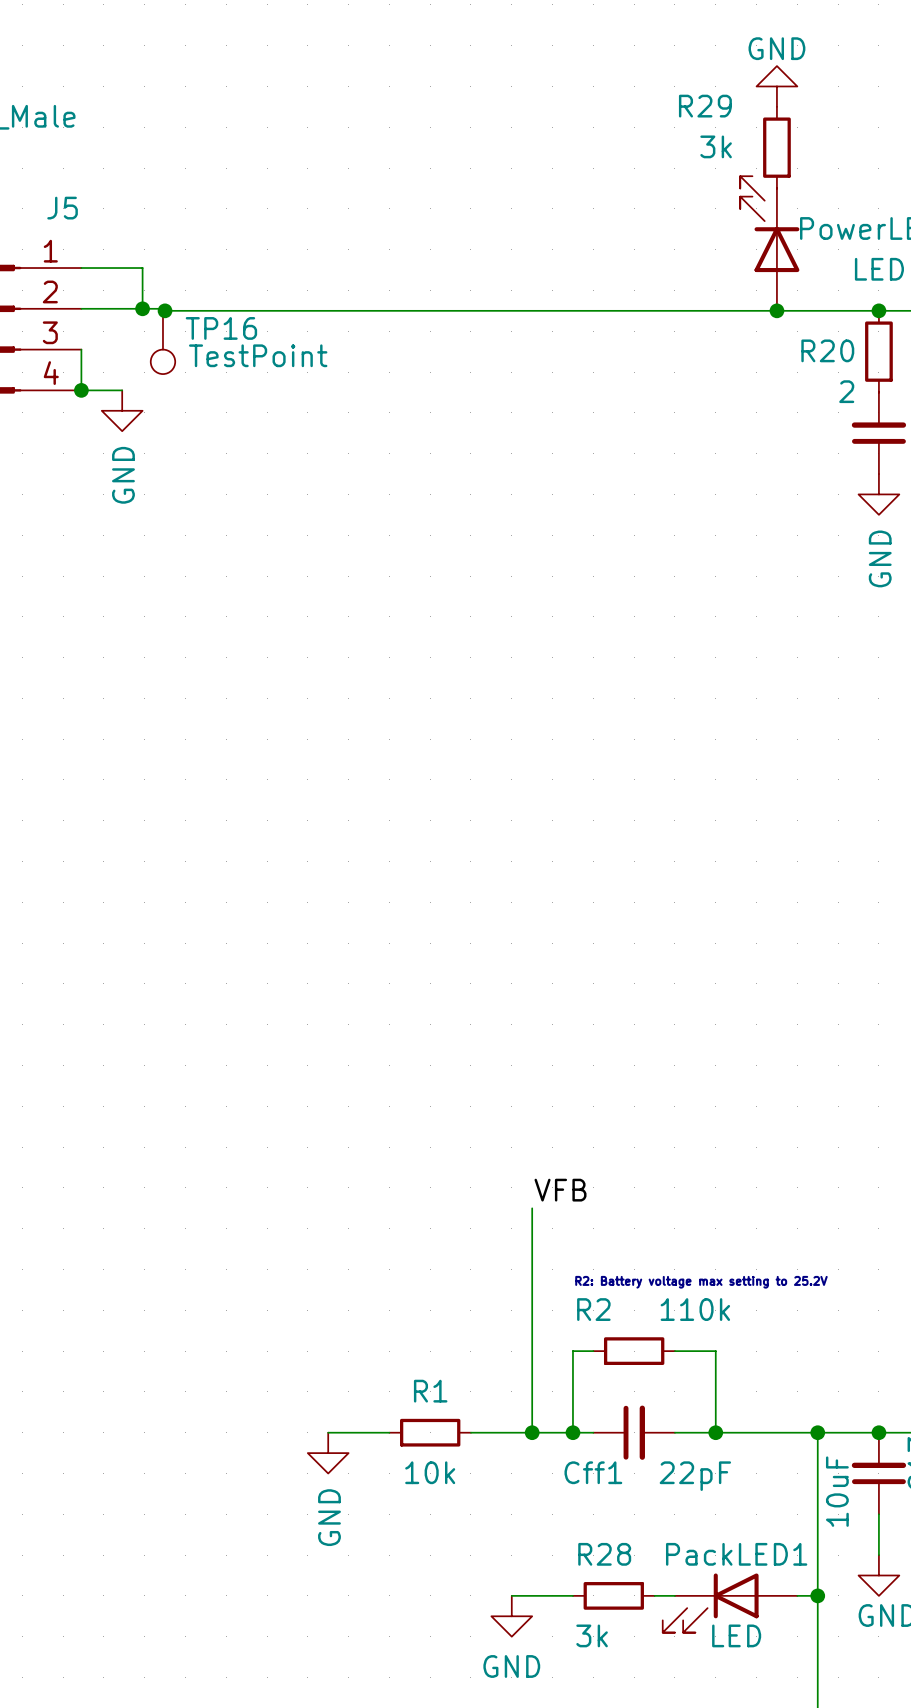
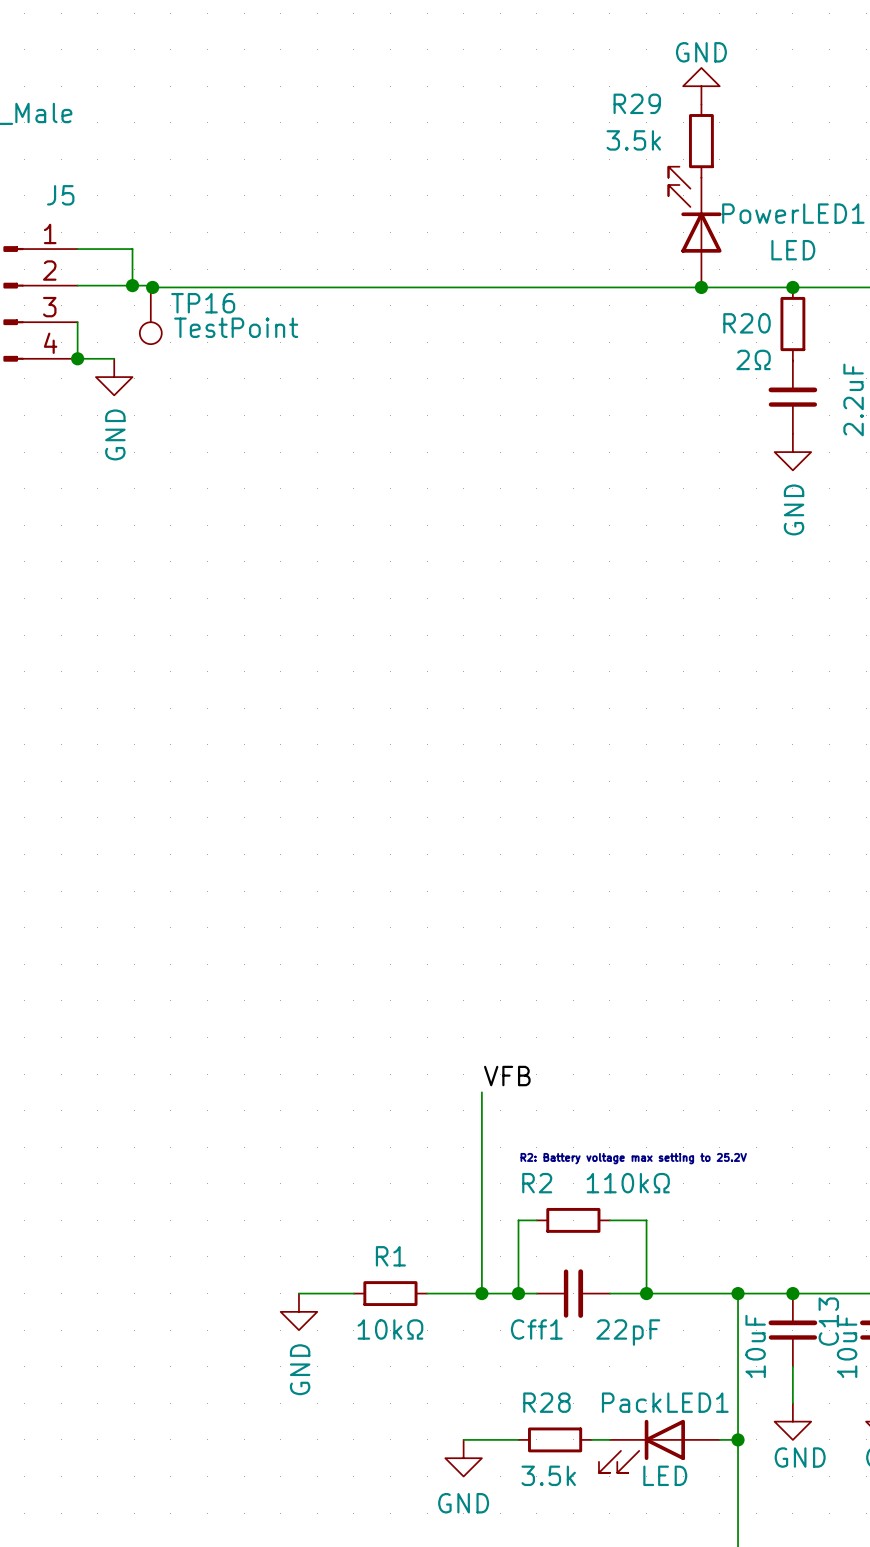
R29 value: 3k (716, 146) -> 3.5k (633, 140)
R20 value: 2 (846, 391) -> 2Ω (753, 359)
R2 value: 110k (695, 1309) -> 110kΩ (628, 1183)
R1 value: 10k (430, 1472) -> 10kΩ (390, 1329)
R28 value: 3k (592, 1635) -> 3.5k (548, 1475)

